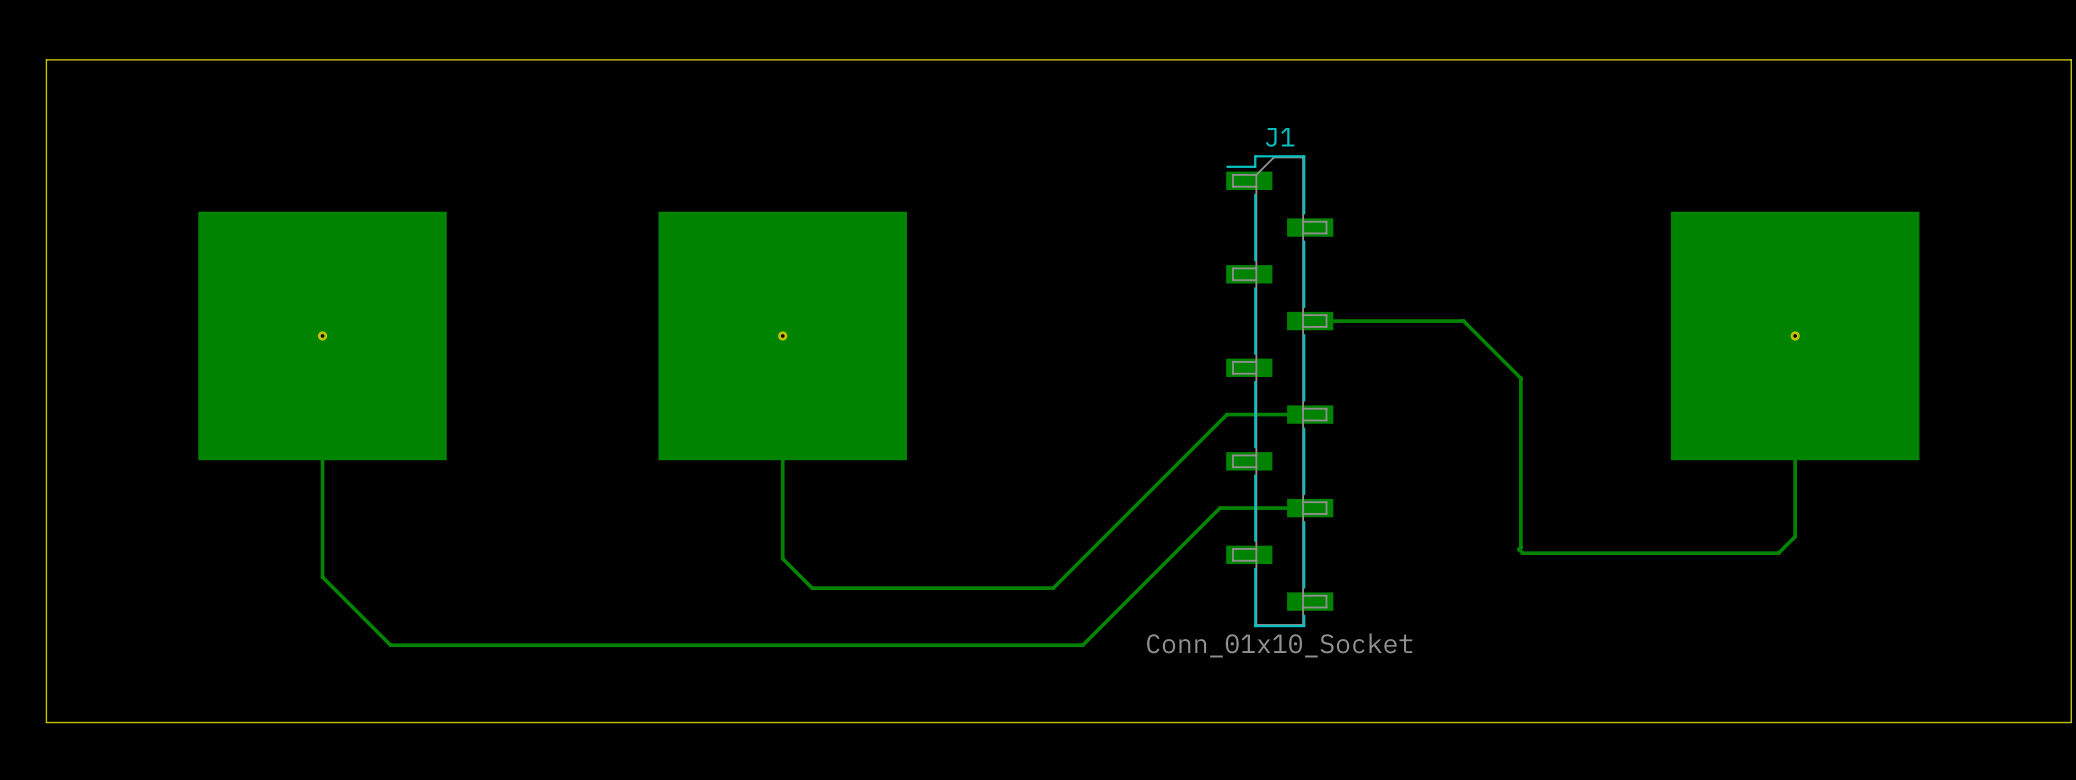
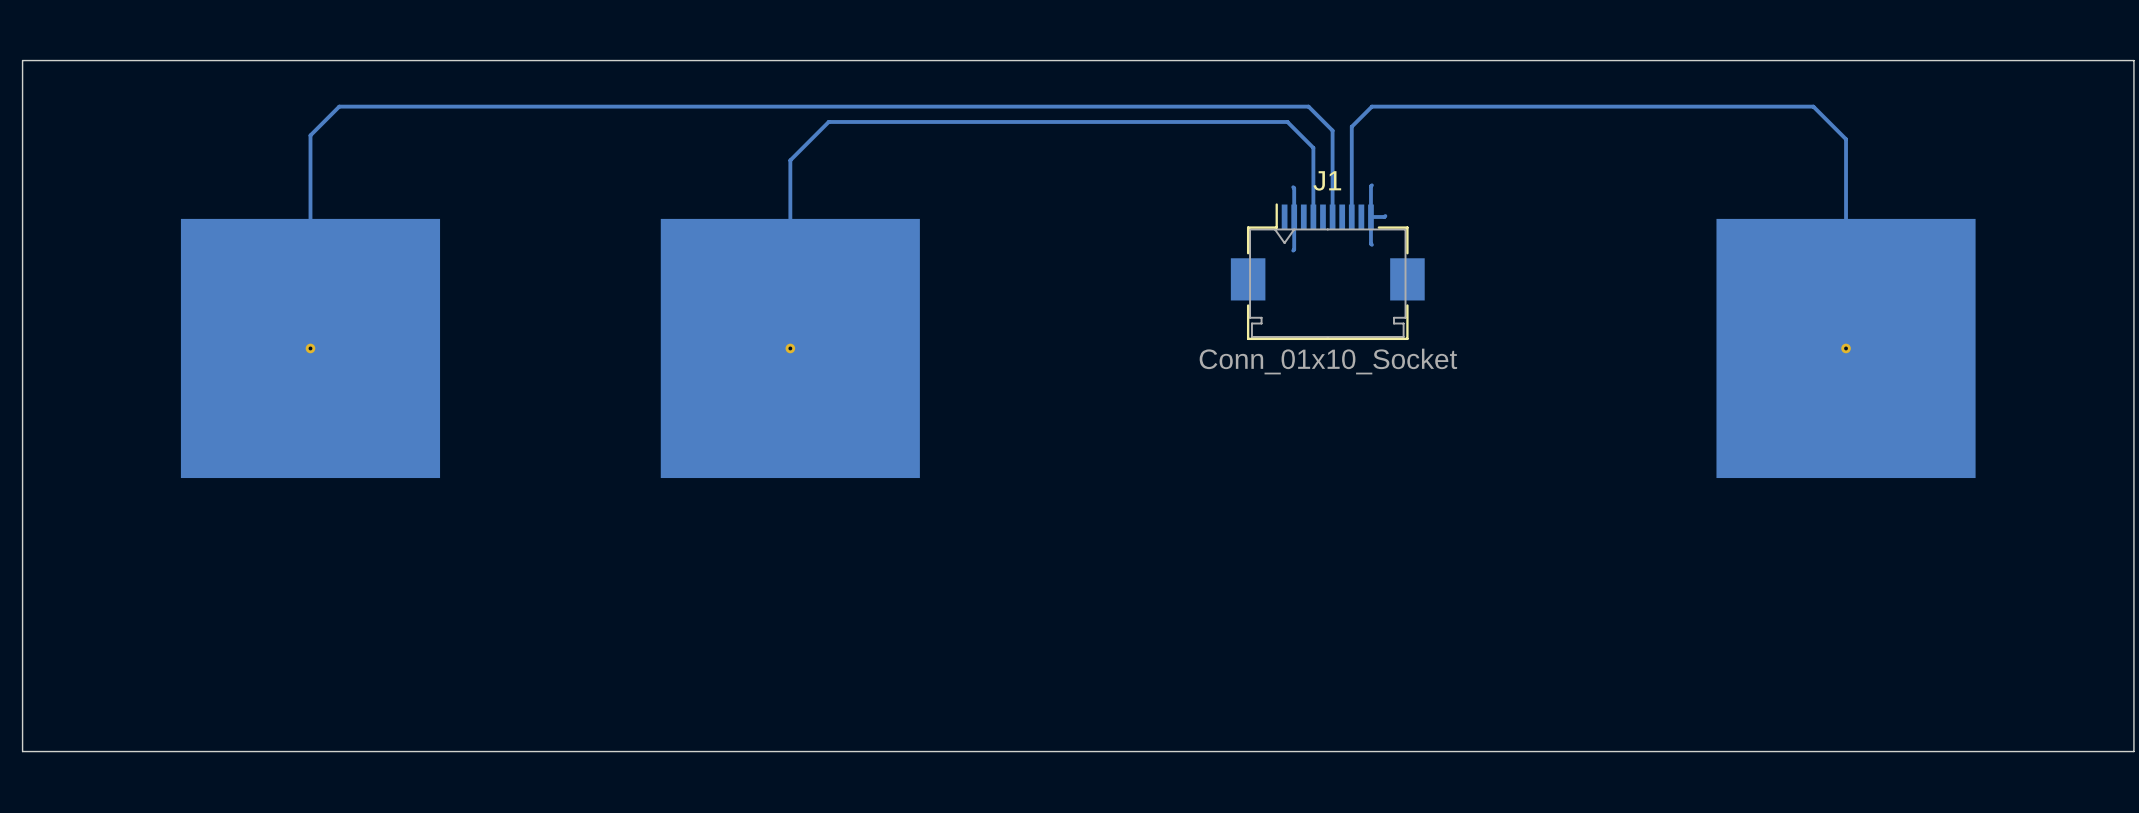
J1 name position: J1 (1280, 137) -> J1 (1327, 180)
J1 footprint: [1226, 155, 1334, 628] -> [1230, 203, 1425, 341]
track: none -> (1371, 185) (1371, 244)
track: none -> (1293, 187) (1293, 250)
track: none -> (1385, 216) (1370, 216)
track: none -> (1313, 216) (1313, 147) (1287, 121) (828, 121) (790, 160) (790, 337)
track: none -> (1332, 216) (1332, 130) (1308, 106) (339, 106) (310, 135) (310, 337)
track: none -> (1351, 216) (1351, 126) (1371, 106) (1813, 106) (1846, 139) (1846, 337)
track: (1310, 321) (1463, 321) (1520, 378) (1520, 547) (1519, 549) (1522, 553) (1778, 553) (1795, 536) (1795, 346) -> none
track: (322, 346) (322, 577) (390, 645) (1082, 645) (1219, 508) (1310, 508) -> none
track: (782, 346) (782, 558) (812, 588) (1053, 588) (1226, 414) (1310, 414) -> none
J1 value position: Conn_01x10_Socket (1279, 645) -> Conn_01x10_Socket (1328, 361)

